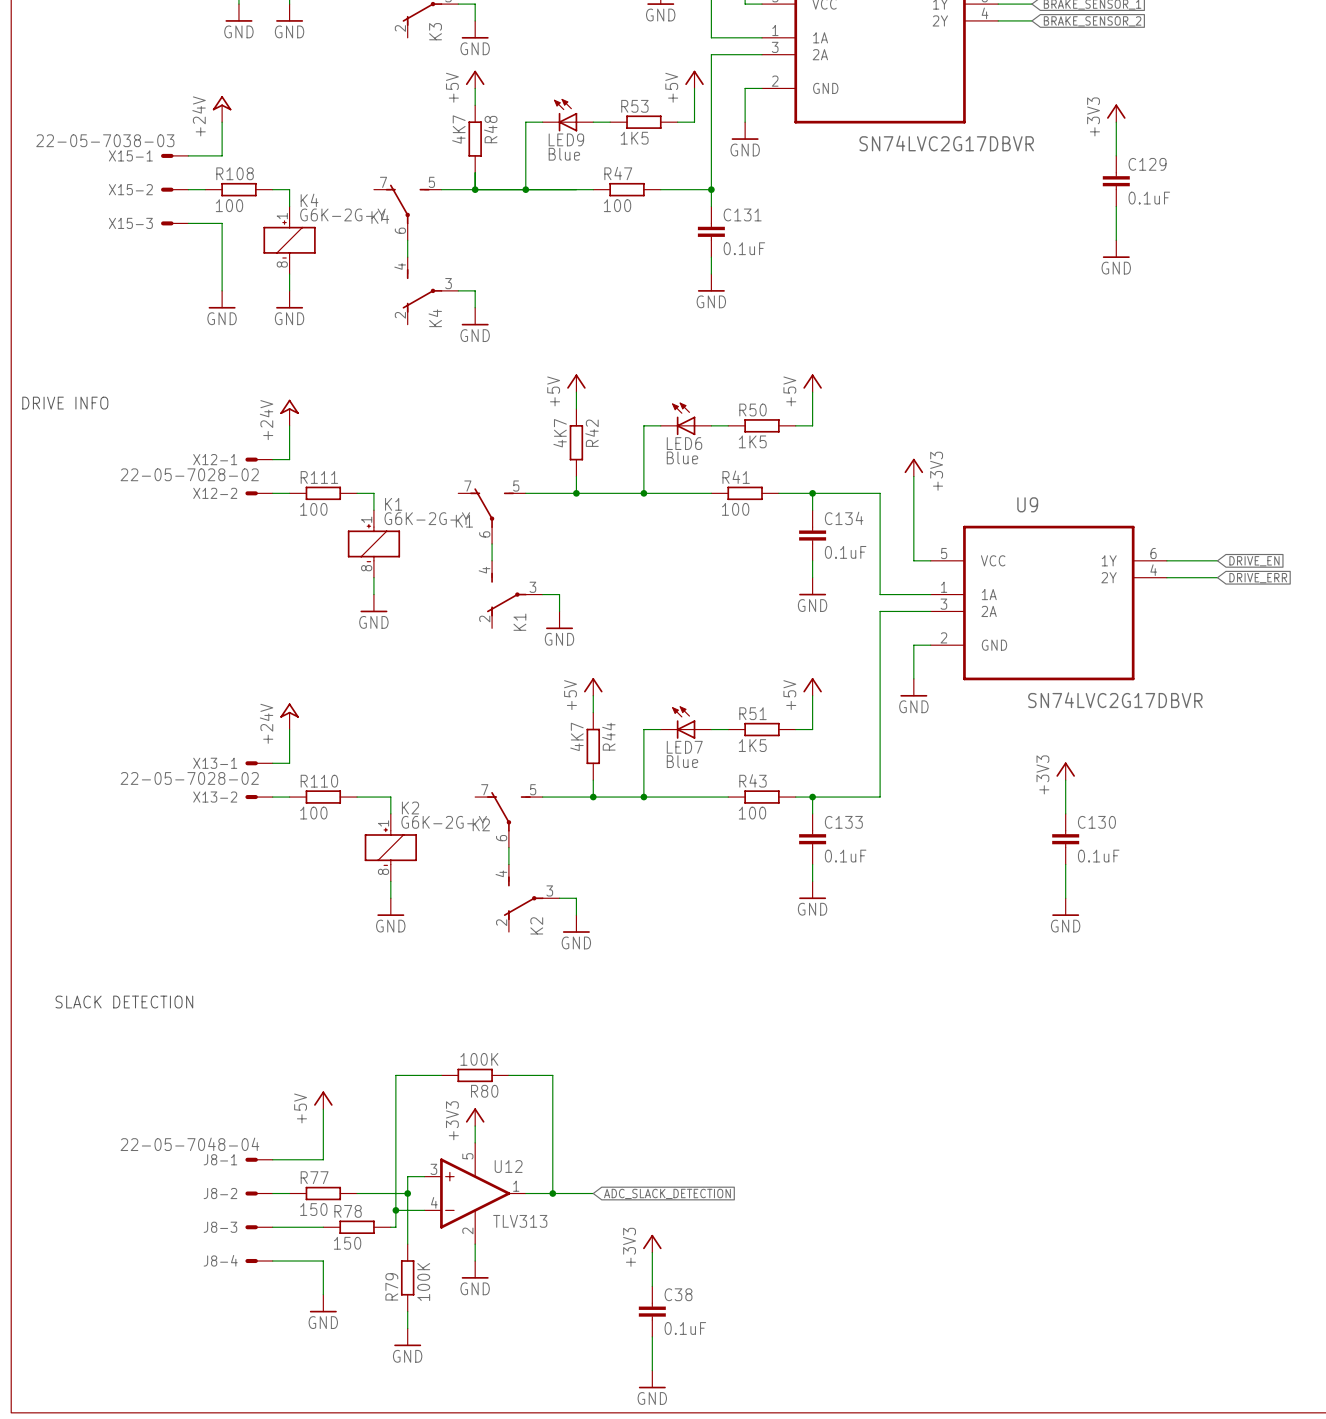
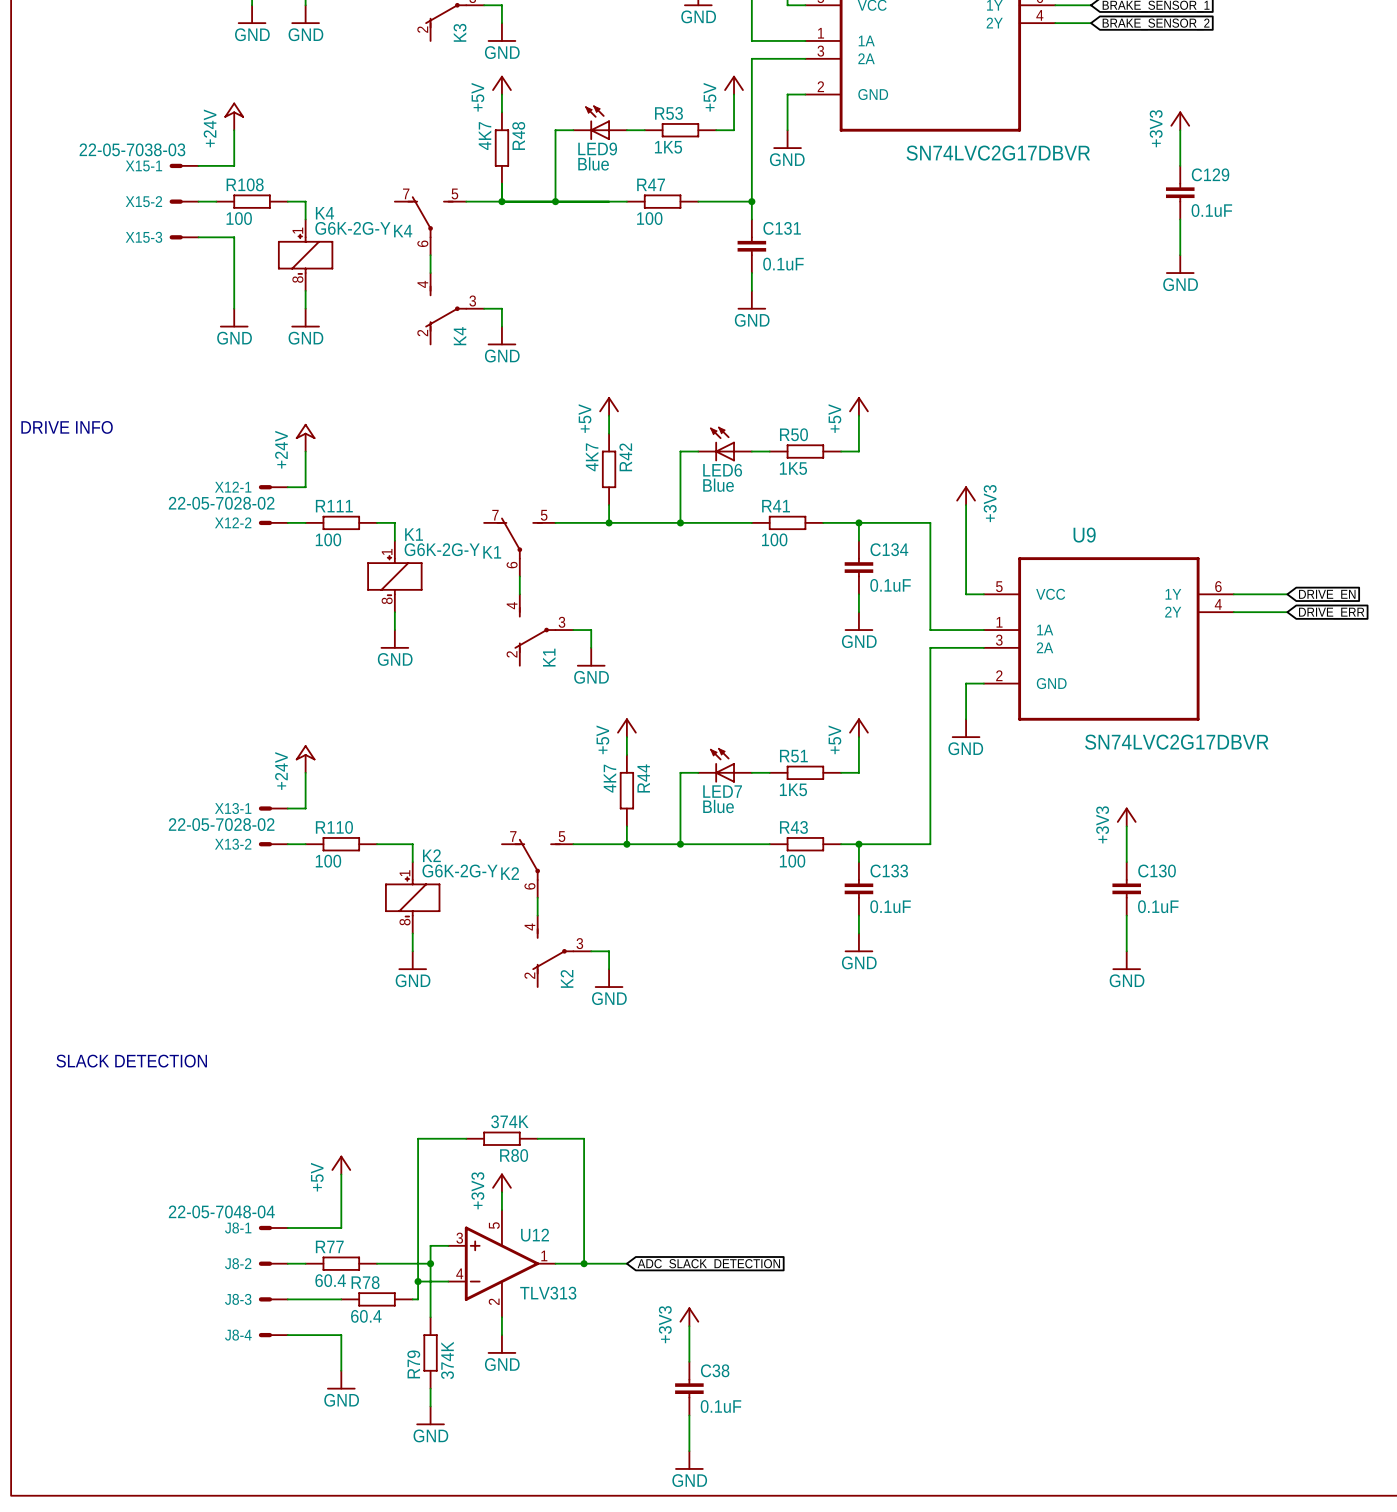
R80 value: 100K (479, 1059) -> 374K (509, 1121)
R77 value: 150 (313, 1209) -> 60.4 (330, 1280)
R78 value: 150 (347, 1243) -> 60.4 (366, 1316)
R79 value: 100K (423, 1282) -> 374K (447, 1360)

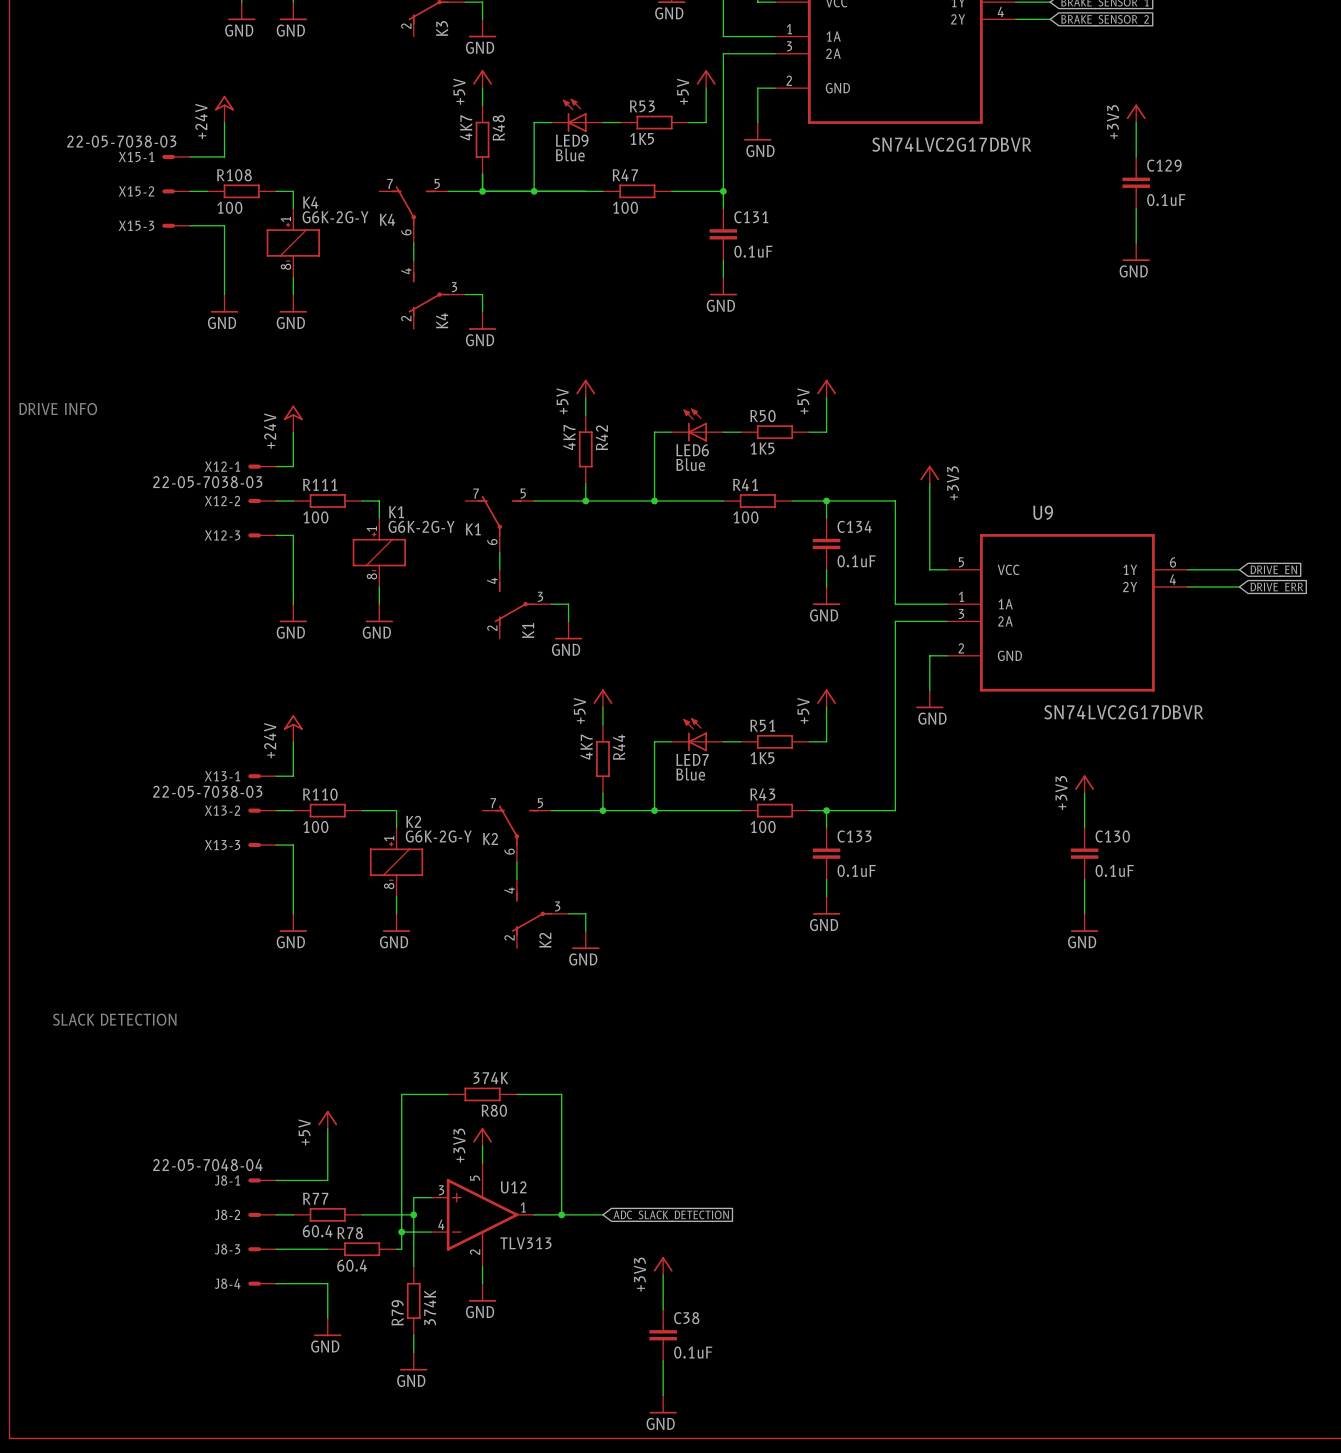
X12-1 value: 22-05-7028-02 (221, 503) -> 22-05-7038-03 (207, 482)
X12-3: none -> (262, 535)
wire: none -> (276, 535) (293, 535) (293, 604)
power symbol: none -> GND (293, 613)
X13-1 value: 22-05-7028-02 (221, 824) -> 22-05-7038-03 (207, 791)
X13-3: none -> (262, 845)
wire: none -> (276, 845) (293, 845) (293, 913)
power symbol: none -> GND (293, 922)

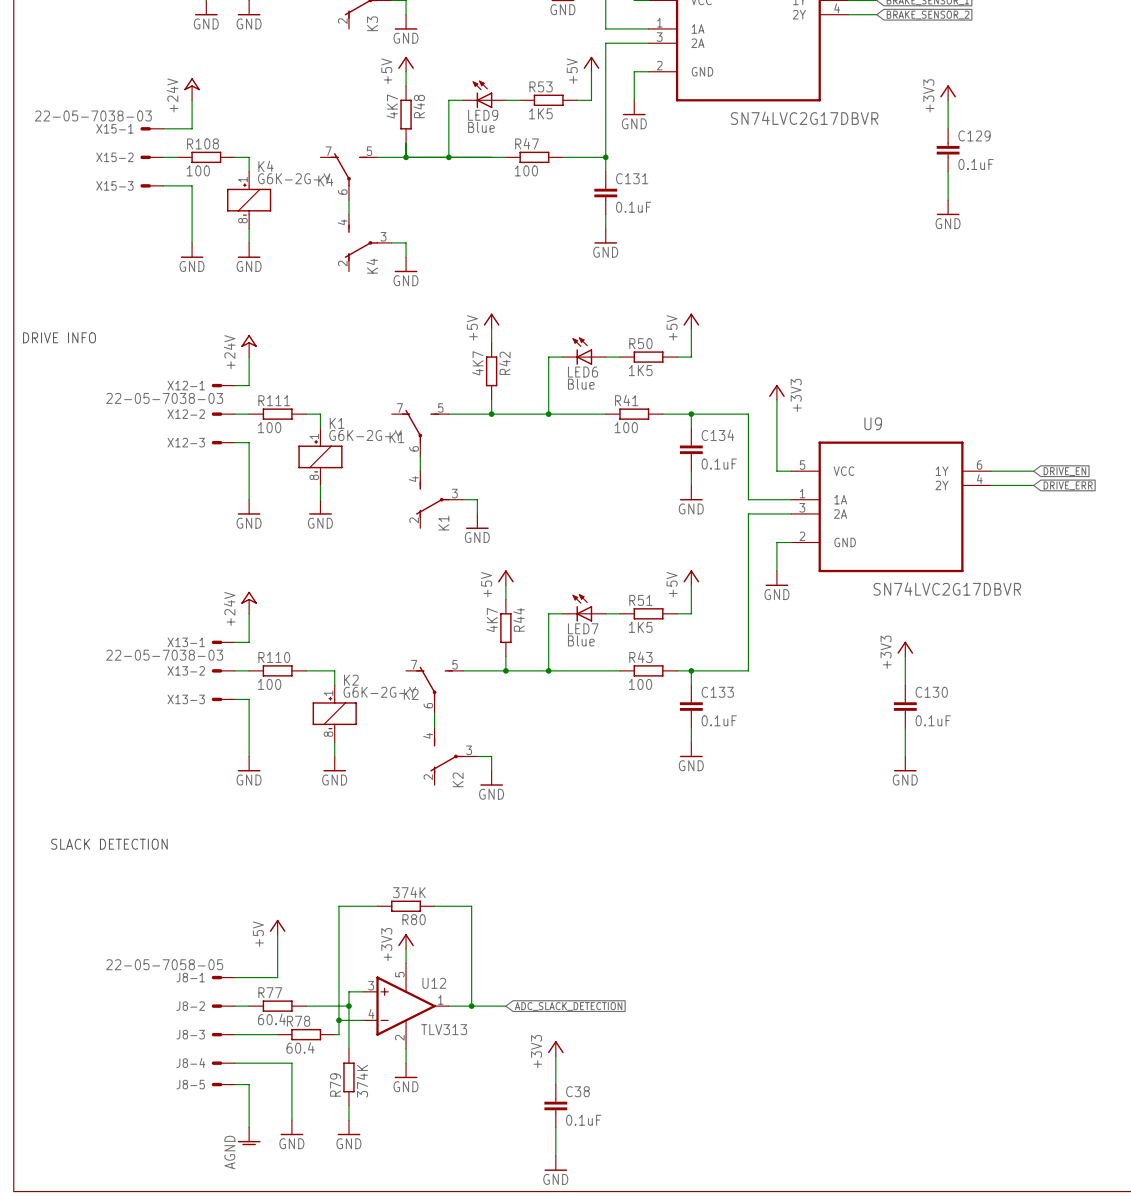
J8-1 value: 22-05-7048-04 (207, 1165) -> 22-05-7058-05 (164, 964)
wire: (327, 1283) (327, 1318) -> (277, 1063) (291, 1063) (291, 1120)
J8-5: none -> (223, 1084)
wire: none -> (234, 1084) (249, 1084) (249, 1127)
power symbol position: GND (327, 1327) -> GND (291, 1127)
power symbol: none -> AGND (249, 1136)

